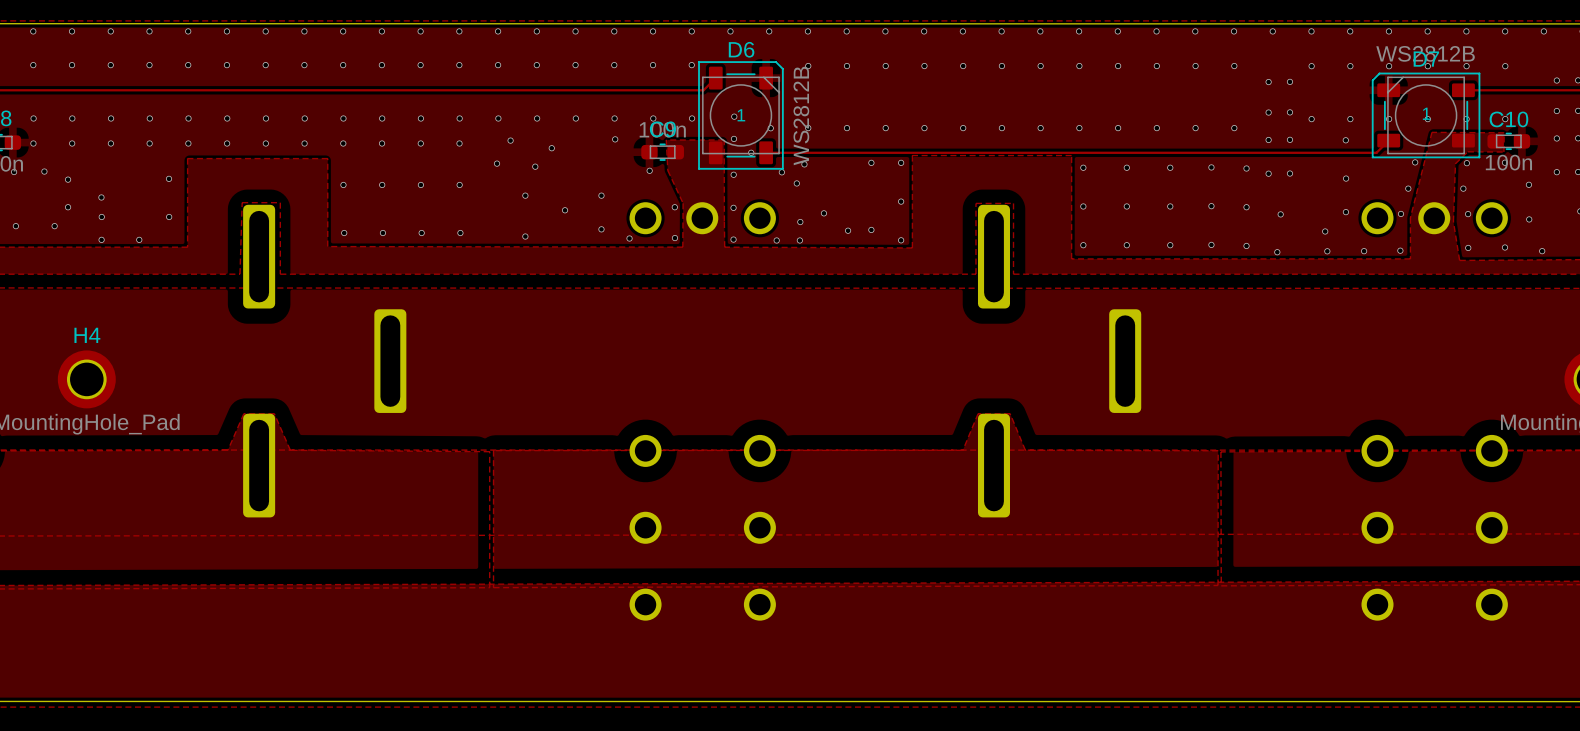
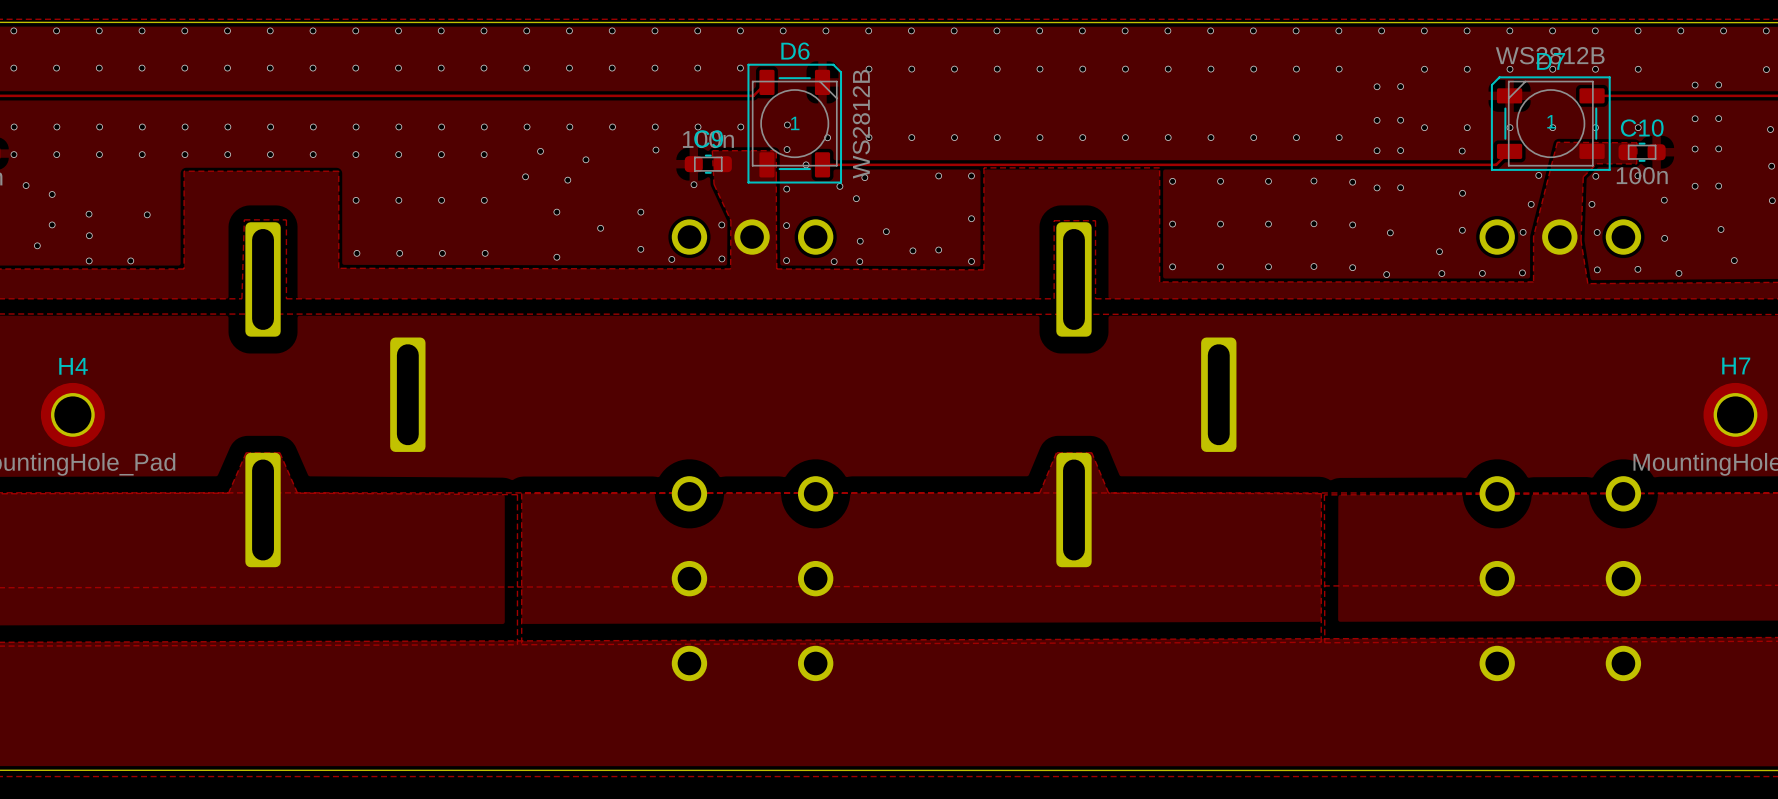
via: (169, 178) -> none
via: none -> (147, 214)
via: (169, 217) -> none

